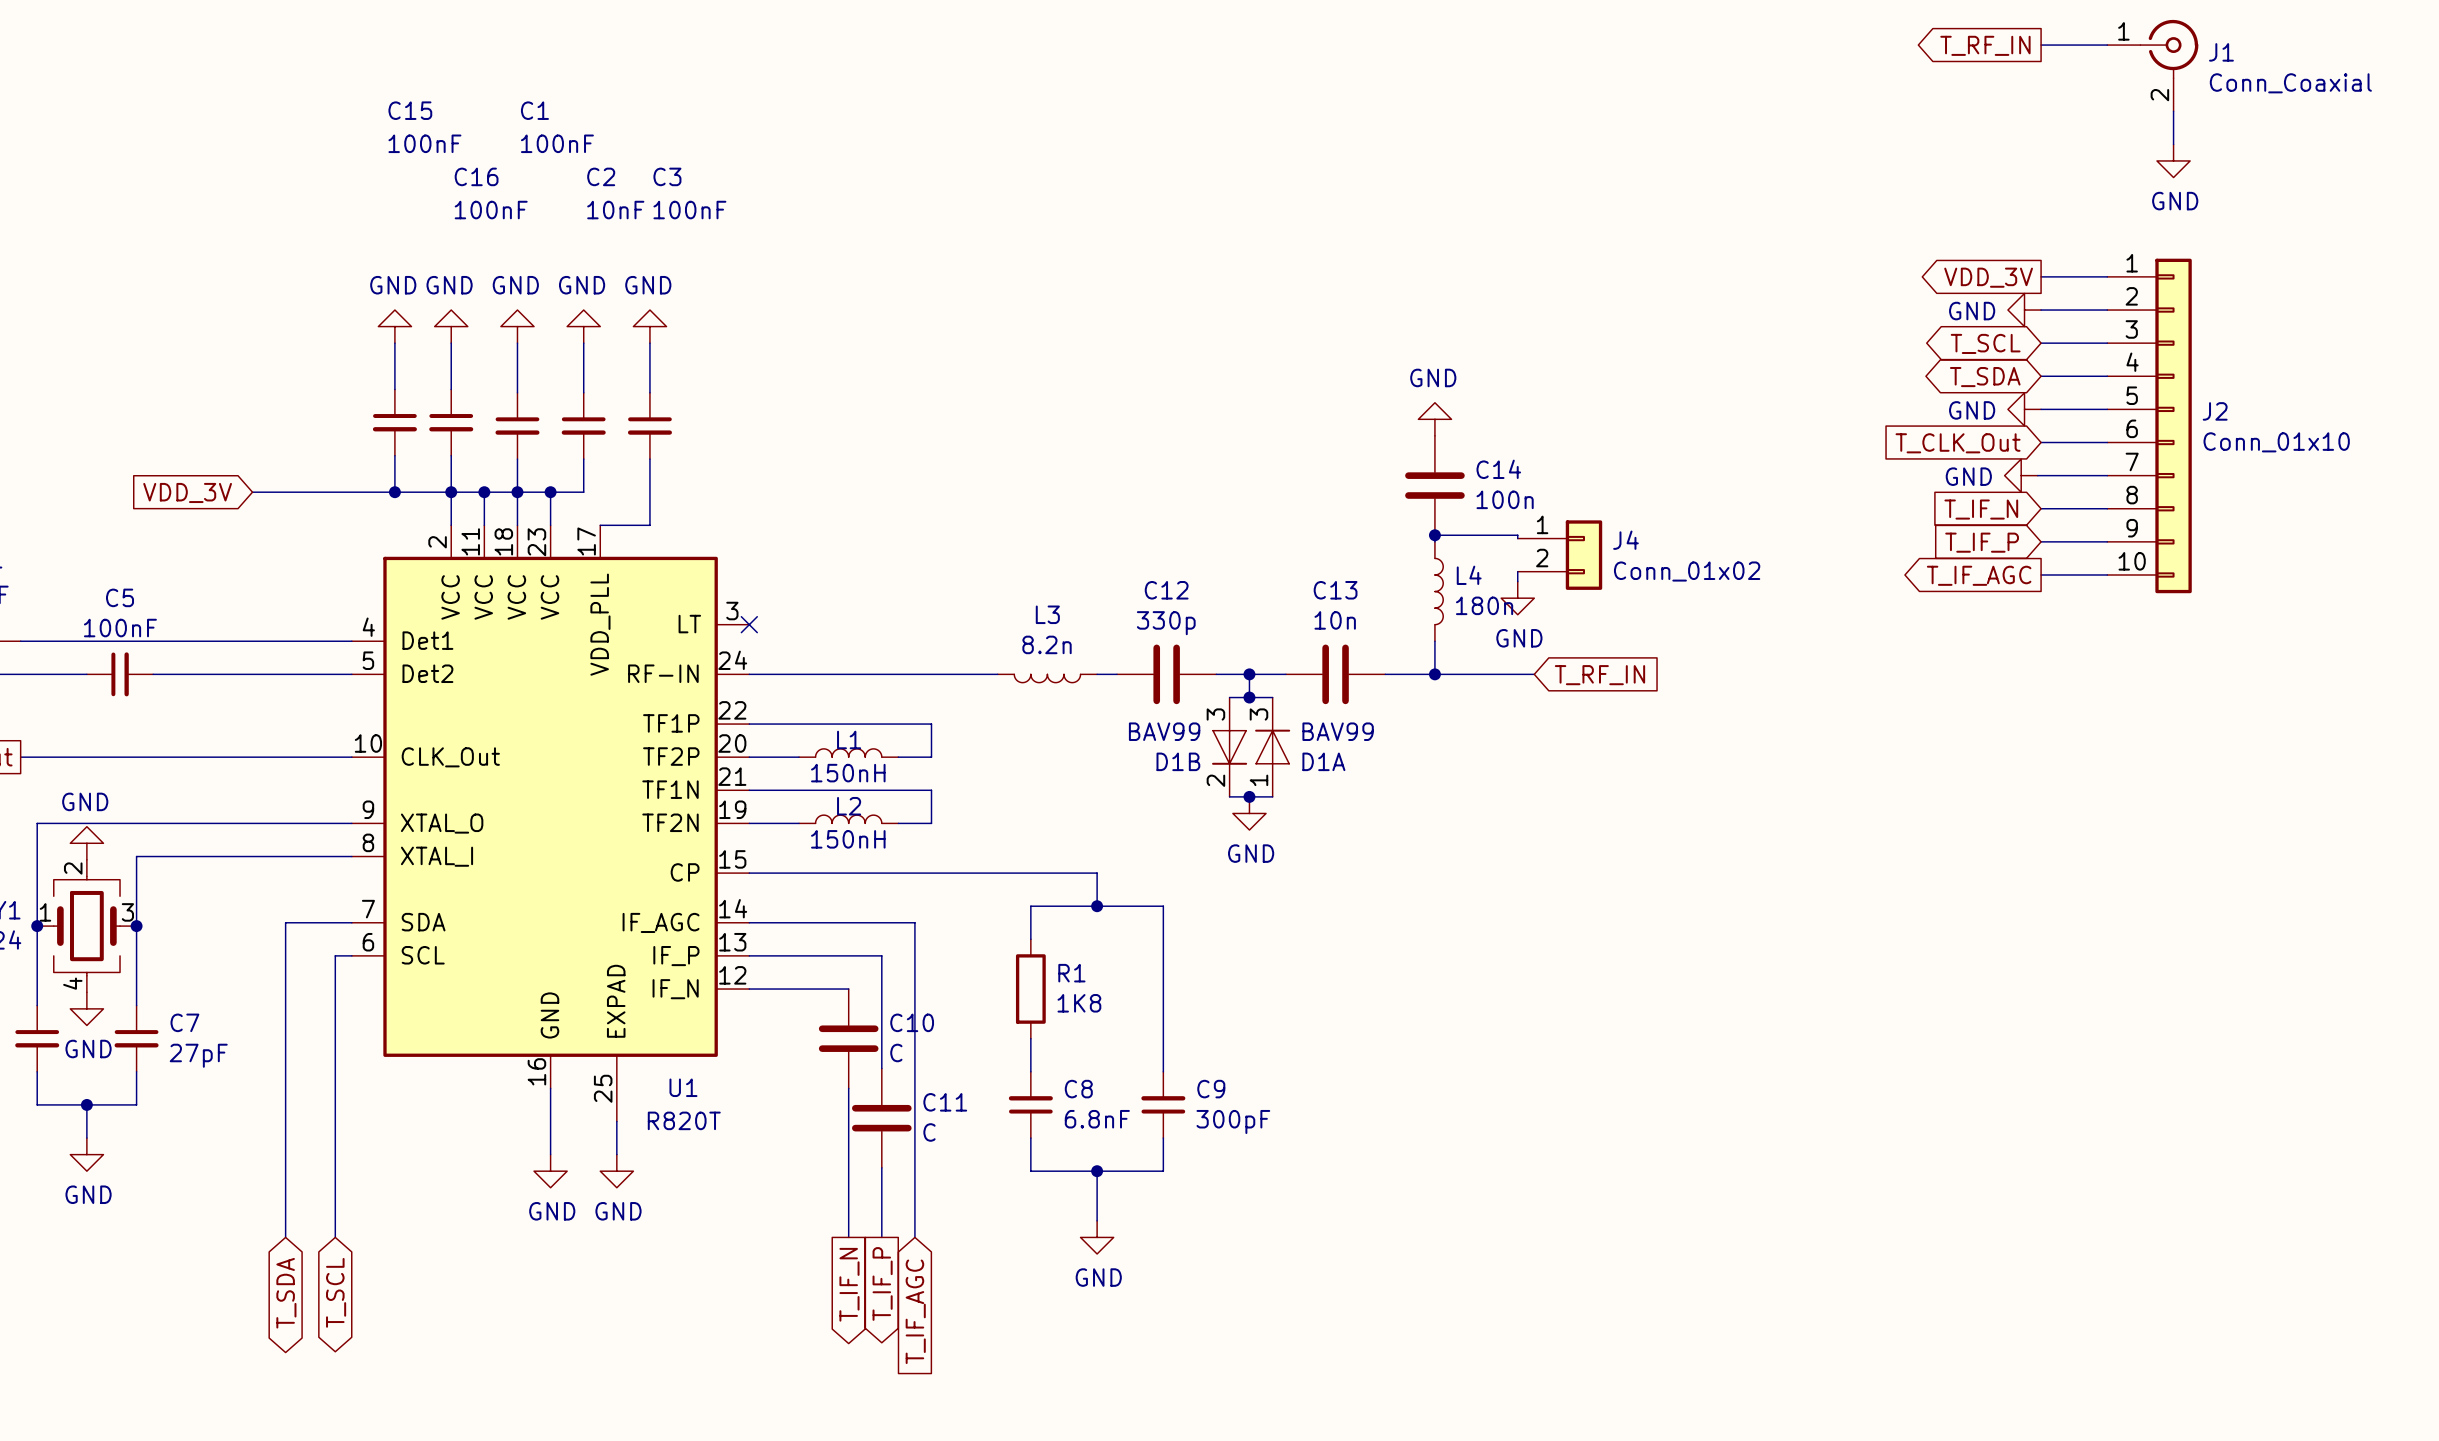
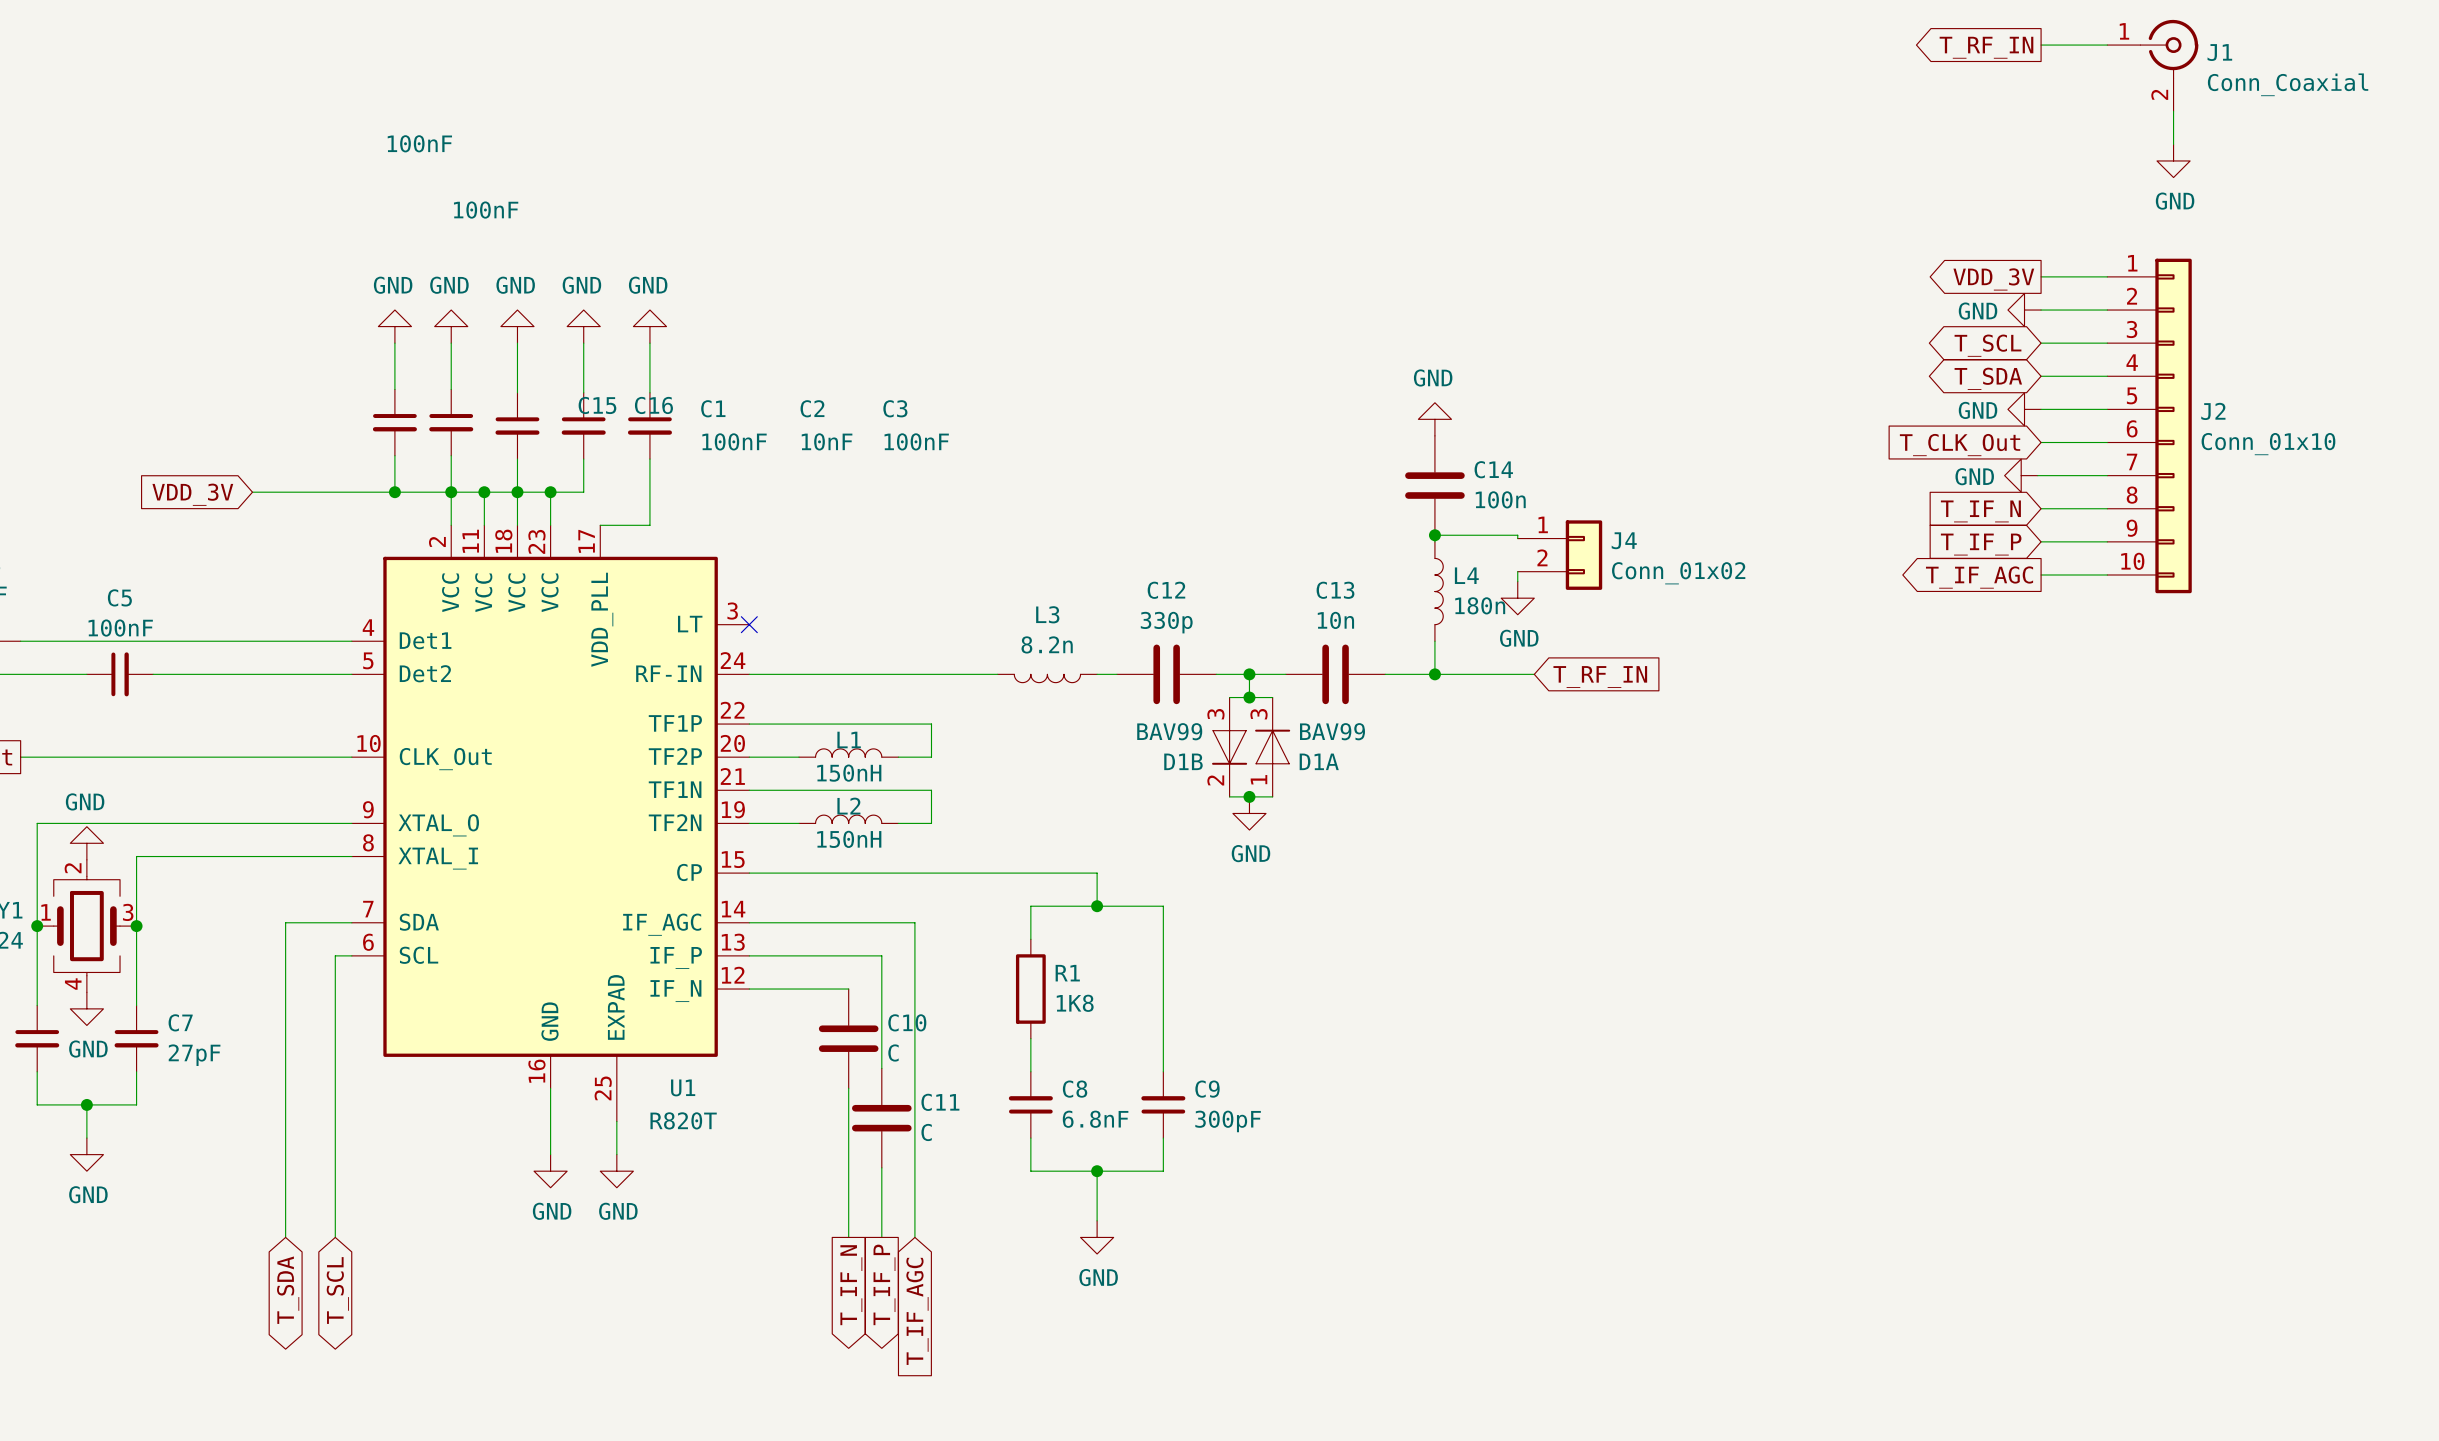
C15 name position: C15 (410, 110) -> C15 (597, 405)
C1 name position: C1 (534, 110) -> C1 (713, 408)
C1 value position: 100nF (557, 143) -> 100nF (734, 441)
C16 name position: C16 (476, 176) -> C16 (653, 405)
C2 name position: C2 (601, 176) -> C2 (812, 408)
C3 name position: C3 (667, 176) -> C3 (895, 408)
C2 value position: 10nF (615, 210) -> 10nF (827, 441)
C3 value position: 100nF (689, 210) -> 100nF (916, 441)

